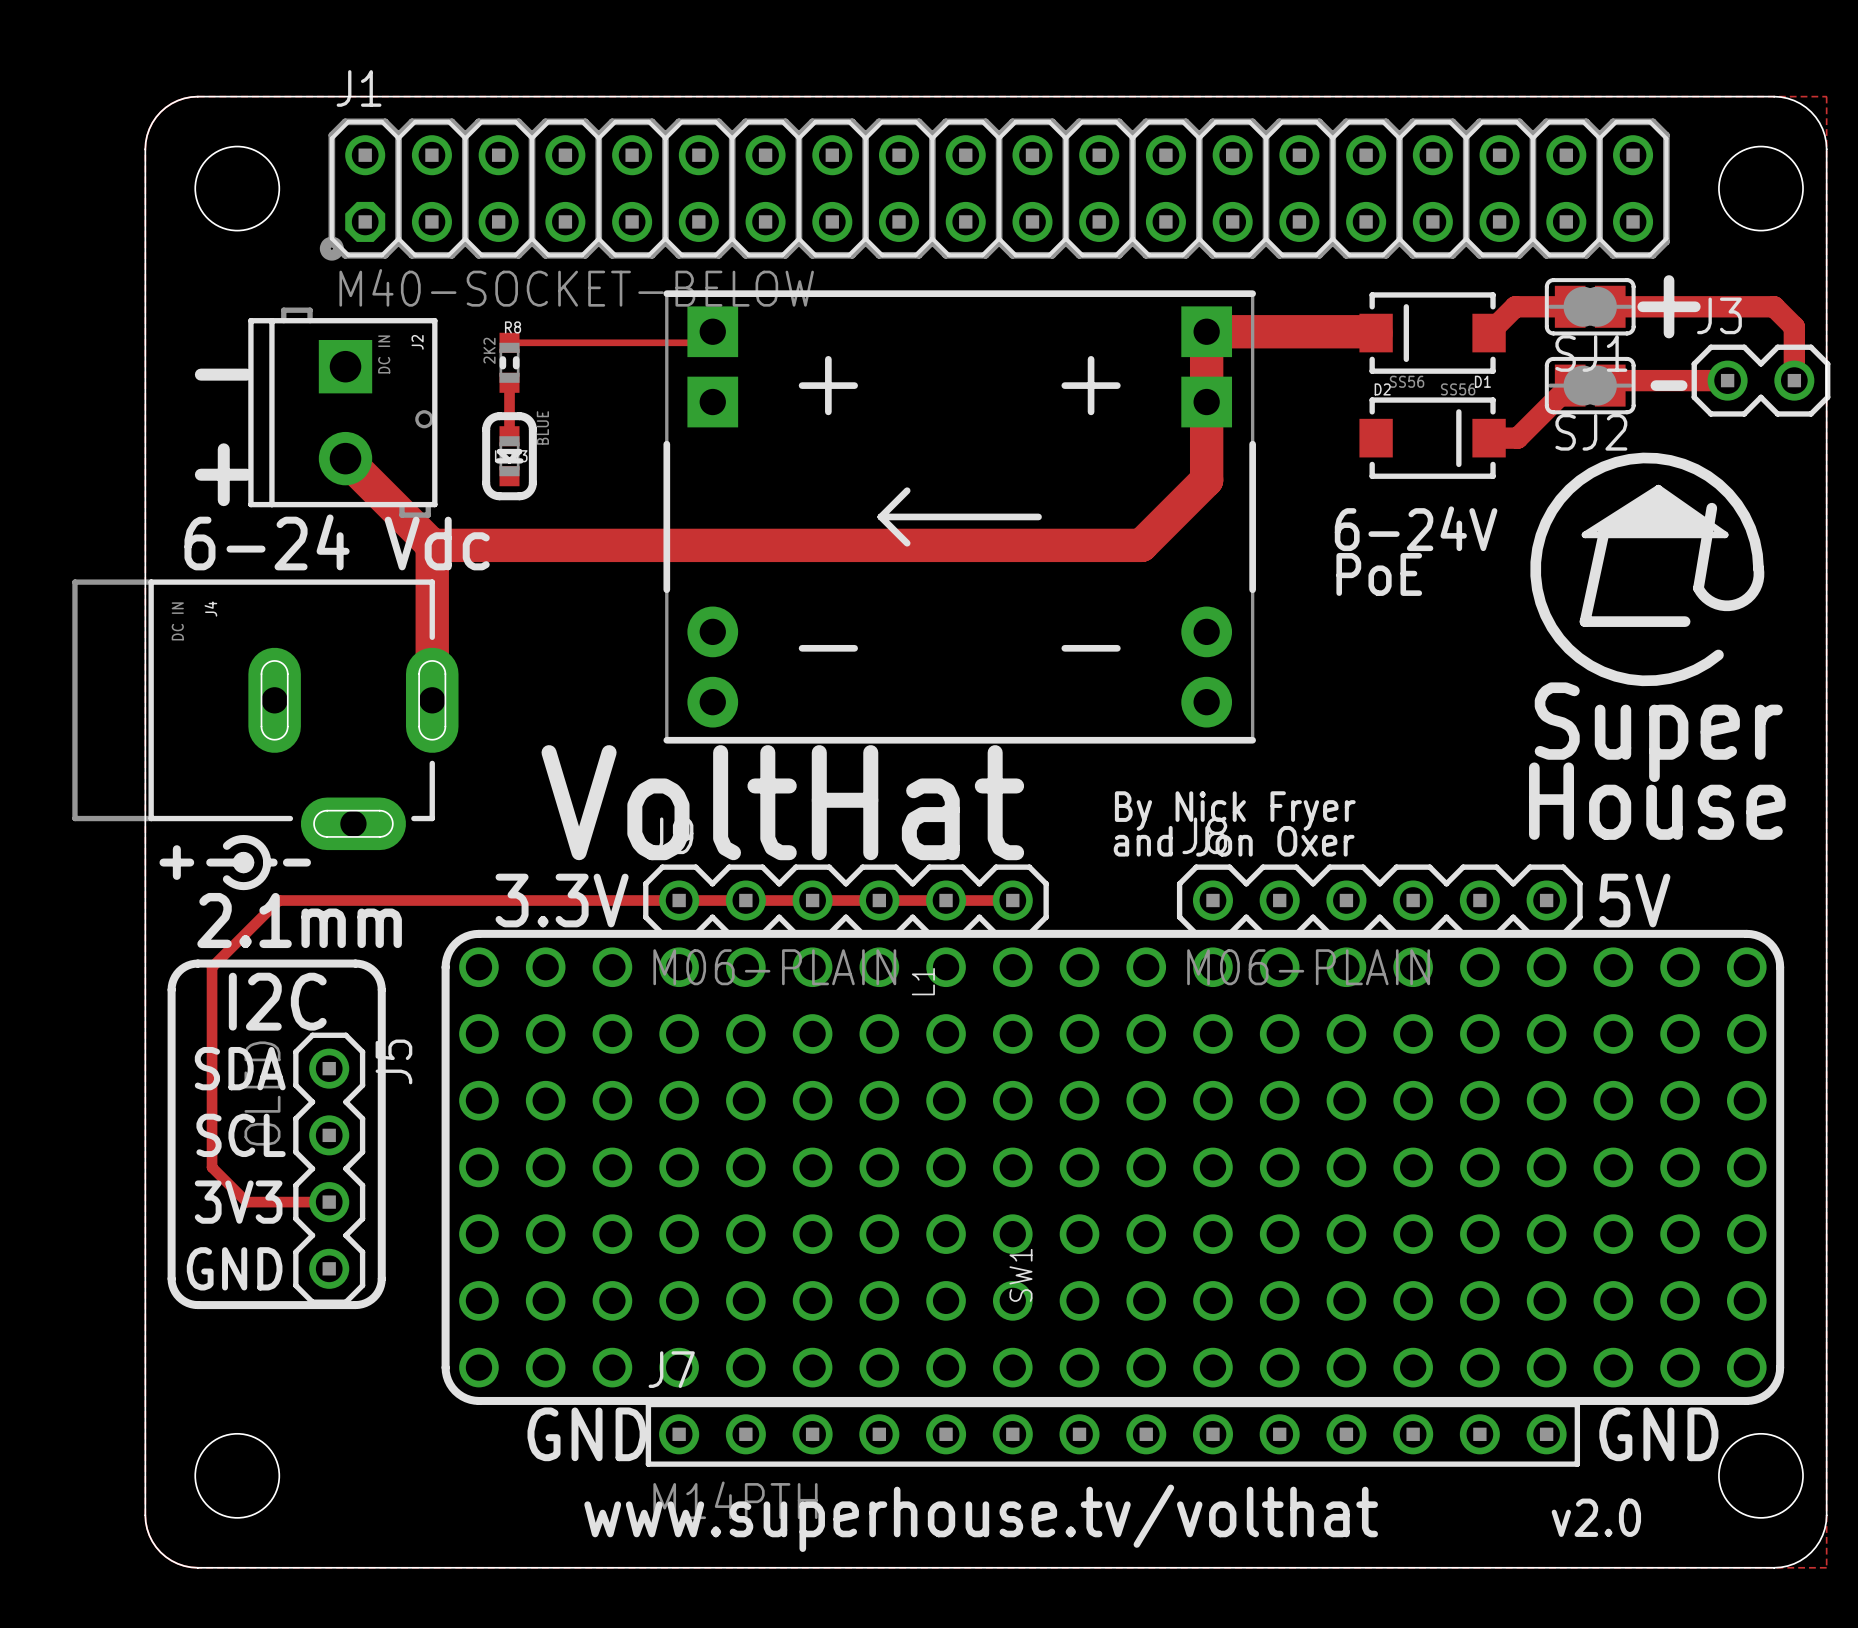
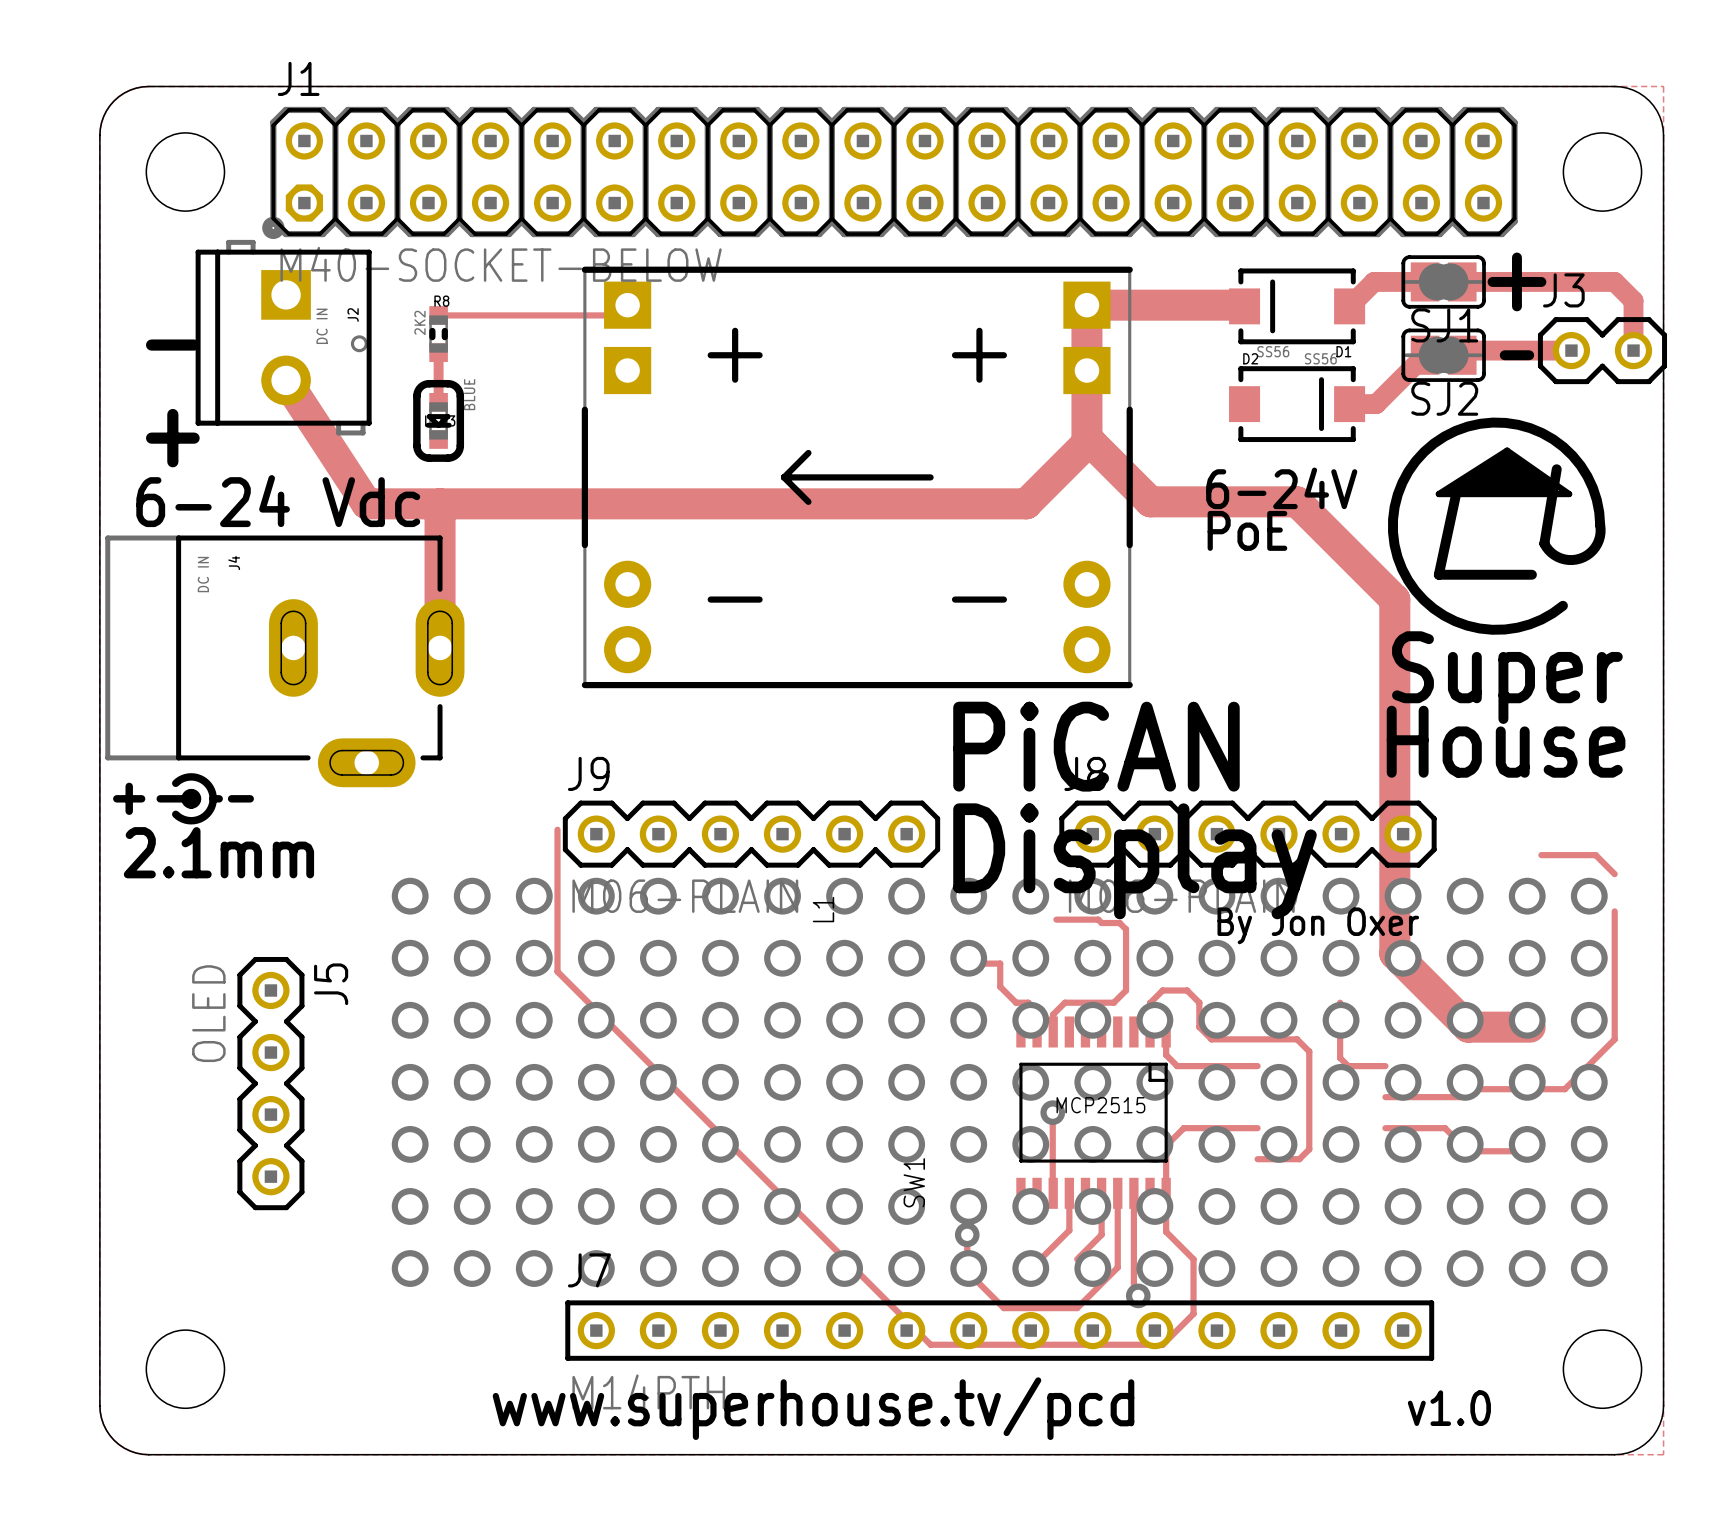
J2 position: (342, 412) -> (283, 337)
track: none -> (286, 380) (366, 503)
track: (345, 458) (432, 545) (432, 700) -> none
track: none -> (1086, 443) (1091, 443) (1150, 501) (1297, 501) (1394, 599) (1394, 953) (1468, 1027) (1530, 1027)
track: none -> (440, 503) (440, 647)
J4 position: (265, 714) -> (284, 661)
text: VoltHat (782, 802) -> none
text: none -> PiCAN (1096, 746)
text: By Nick Fryer (1235, 811) -> none
text: and Jon Oxer (1234, 841) -> none
track: none -> (557, 829) (557, 971) (930, 1344) (1162, 1344) (1193, 1313) (1193, 1259) (1166, 1231) (1166, 1145) (1183, 1128) (1257, 1128)
text: 3.3V (562, 900) -> none
track: (1012, 900) (278, 900) (212, 967) (212, 1167) (246, 1202) (329, 1202) -> none
text: 5V (1634, 900) -> none
text position: 2.1mm (299, 920) -> 2.1mm (218, 852)
track: none -> (1541, 855) (1595, 855) (1614, 874)
text: none -> Display (1135, 861)
line: (478, 933) (1746, 933) (1759, 936) (1767, 940) (1775, 950) (1780, 967) (1780, 1367) (1777, 1380) (1773, 1387) (1763, 1396) (1746, 1400) (478, 1400) (466, 1398) (458, 1394) (450, 1384) (445, 1367) (445, 967) (448, 954) (455, 943) (466, 936) (478, 933) -> none
line: (197, 963) (358, 963) (371, 968) (378, 976) (381, 989) (381, 1278) (378, 1291) (368, 1301) (355, 1305) (197, 1305) (184, 1301) (175, 1291) (171, 1278) (171, 986) (175, 976) (181, 968) (197, 963) -> none
track: none -> (1614, 911) (1614, 1039) (1564, 1089) (1468, 1089) (1460, 1097) (1385, 1097)
track: none -> (1056, 919) (1098, 919) (1101, 923) (1119, 923) (1126, 929) (1126, 990) (1113, 1002) (1064, 1002) (1053, 1014) (1053, 1031)
text: none -> By Jon Oxer (1318, 925)
text: I2C (277, 1001) -> none
track: none -> (955, 960) (958, 963) (1000, 963) (1000, 986) (1016, 1002) (1028, 1002) (1037, 1011) (1037, 1031)
text: SDA (240, 1068) -> none
track: none -> (1340, 1002) (1340, 1057) (1348, 1066) (1385, 1066)
track: none -> (1150, 1031) (1150, 1003) (1162, 990) (1187, 990) (1199, 1002) (1199, 1027) (1211, 1039) (1297, 1039) (1309, 1051) (1309, 1149) (1299, 1159) (1257, 1159)
track: none -> (1166, 1031) (1166, 1055) (1177, 1066) (1257, 1066)
text: SCL (241, 1135) -> none
track: none -> (1052, 1112) (1053, 1193)
via: none -> (1052, 1112)
part: none -> (1093, 1112)
text: 3V3 (238, 1202) -> none
track: none -> (1385, 1128) (1445, 1128) (1468, 1151) (1530, 1151)
text: GND (234, 1268) -> none
track: none -> (1069, 1193) (1069, 1230) (1040, 1259)
track: none -> (1101, 1193) (1101, 1234) (1077, 1259)
track: none -> (1117, 1193) (1117, 1267) (1077, 1308) (1003, 1308) (967, 1271) (967, 1234)
track: none -> (1133, 1193) (1133, 1291) (1138, 1295)
via: none -> (967, 1234)
via: none -> (1138, 1295)
text: GND (587, 1434) -> none
text: GND (1658, 1434) -> none
text: v2.0 (1596, 1517) -> v1.0 (1449, 1408)
text: www.superhouse.tv/volthat (981, 1518) -> www.superhouse.tv/pcd (813, 1408)

